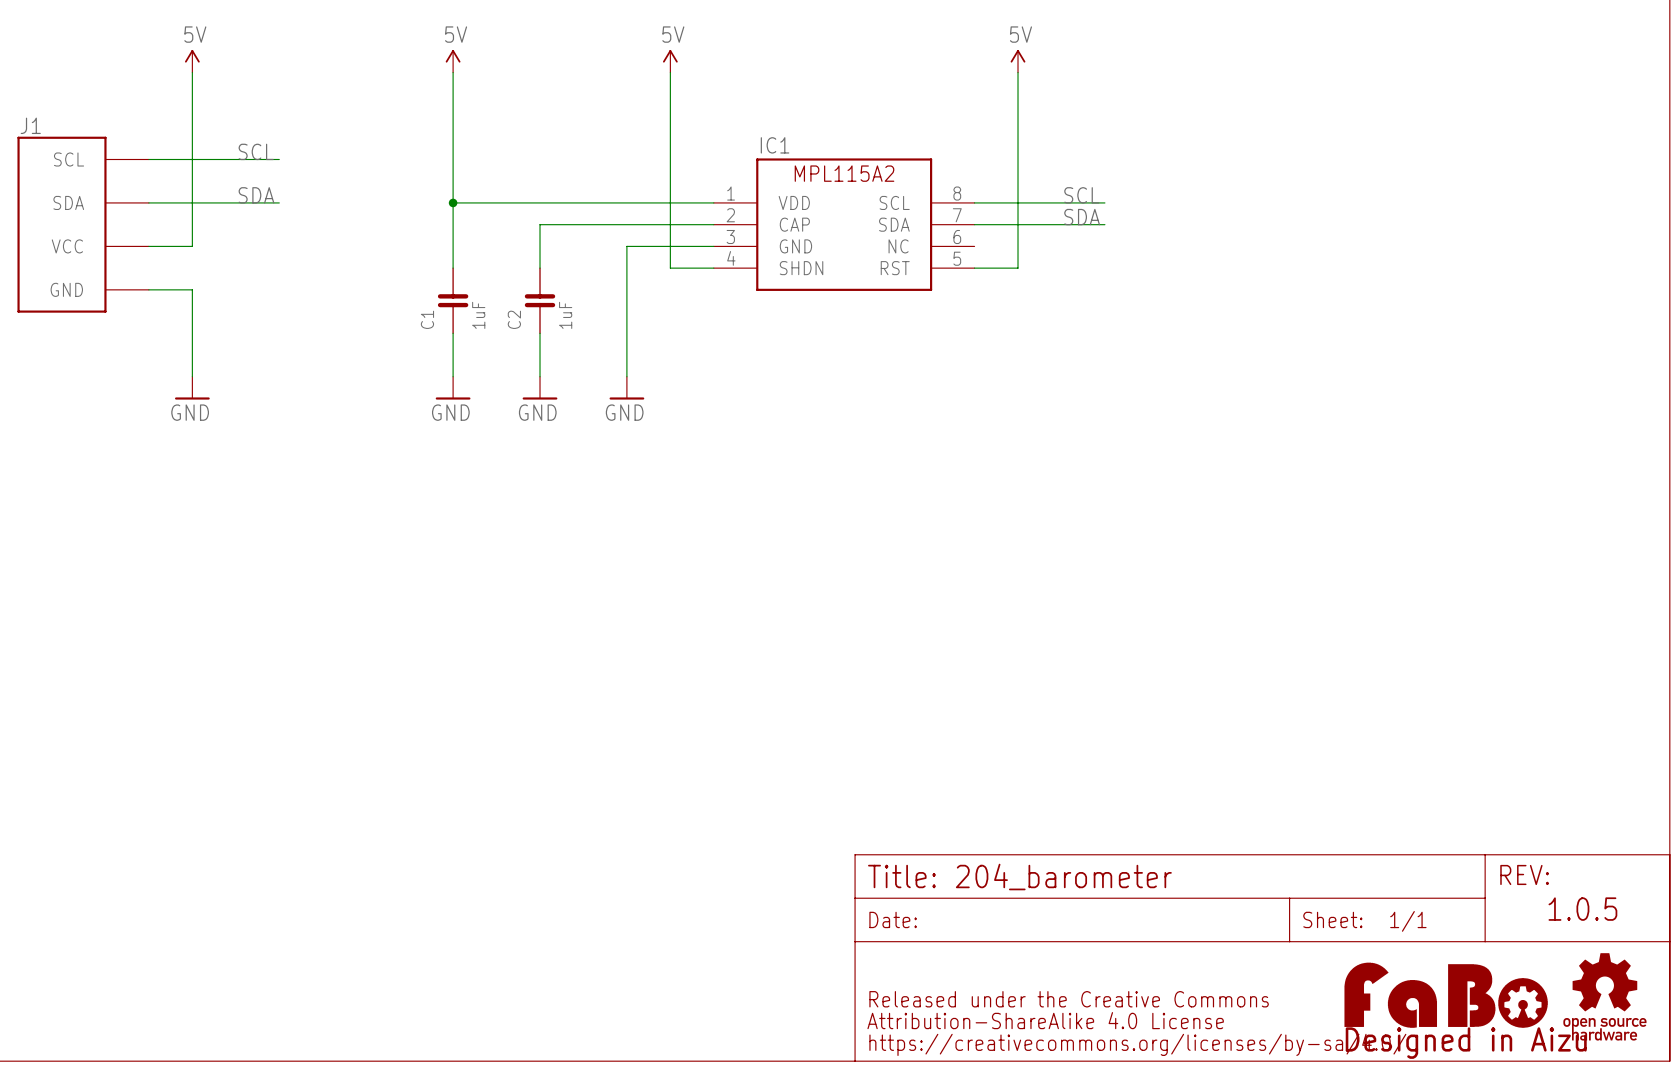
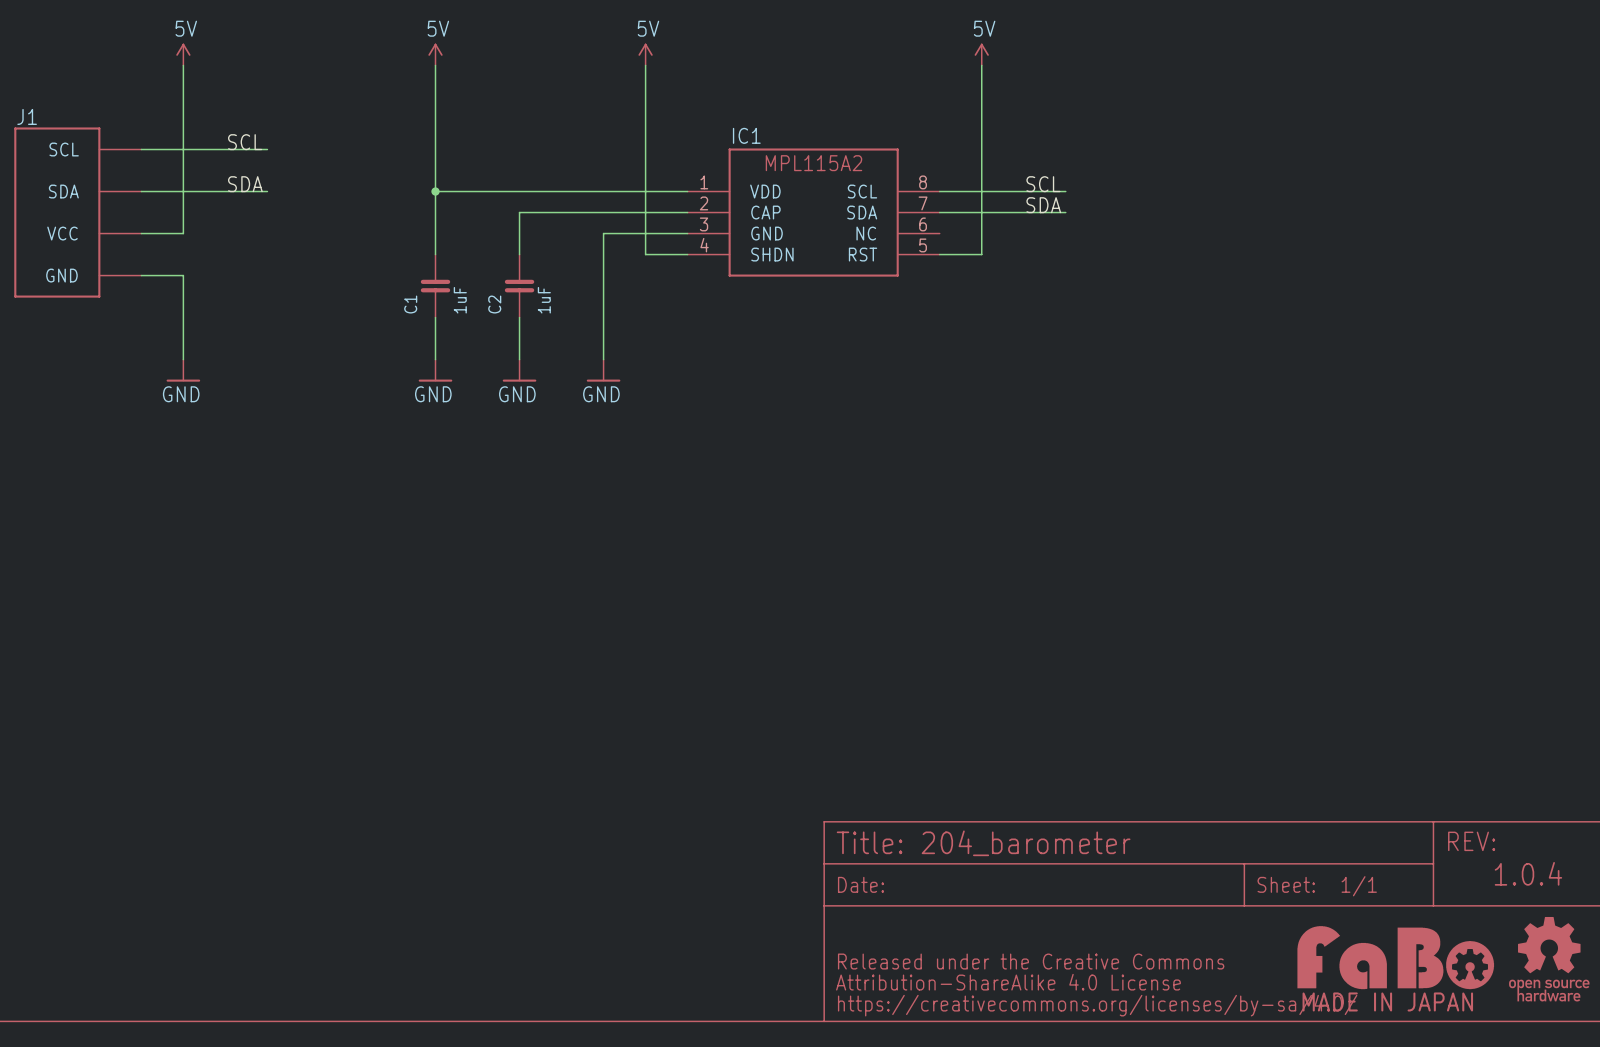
text: 1.0.5 (1582, 909) -> 1.0.4 (1528, 873)
part text: none -> MADE IN JAPAN (1387, 1001)
part text: Designed in Aizu (1466, 1043) -> none

